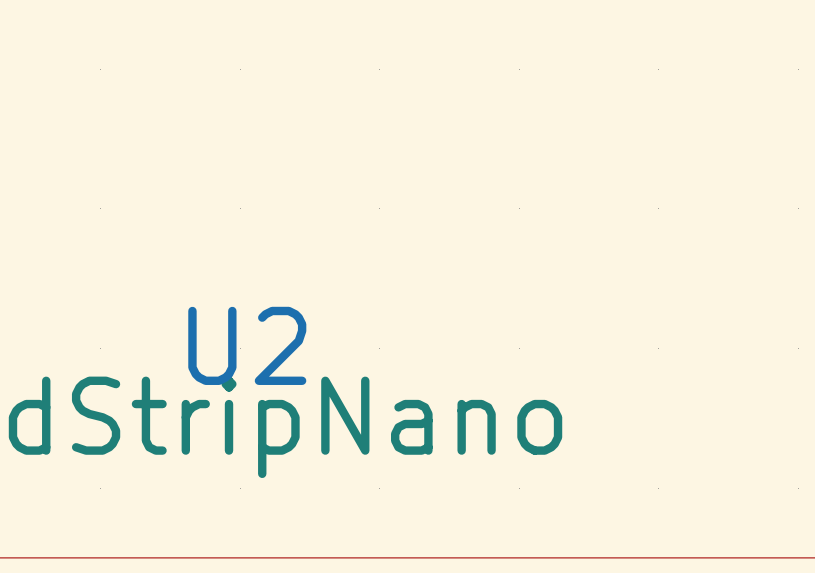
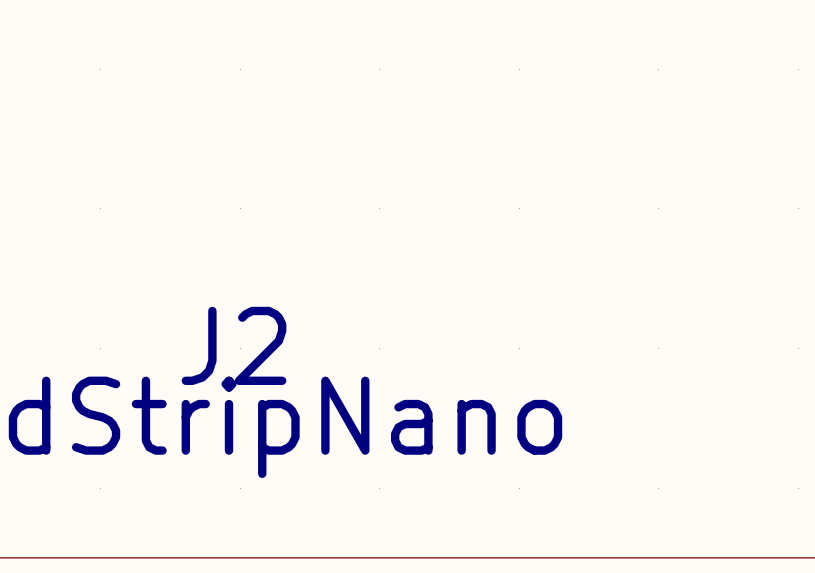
U2 name: U2 (247, 345) -> J2 (233, 345)

